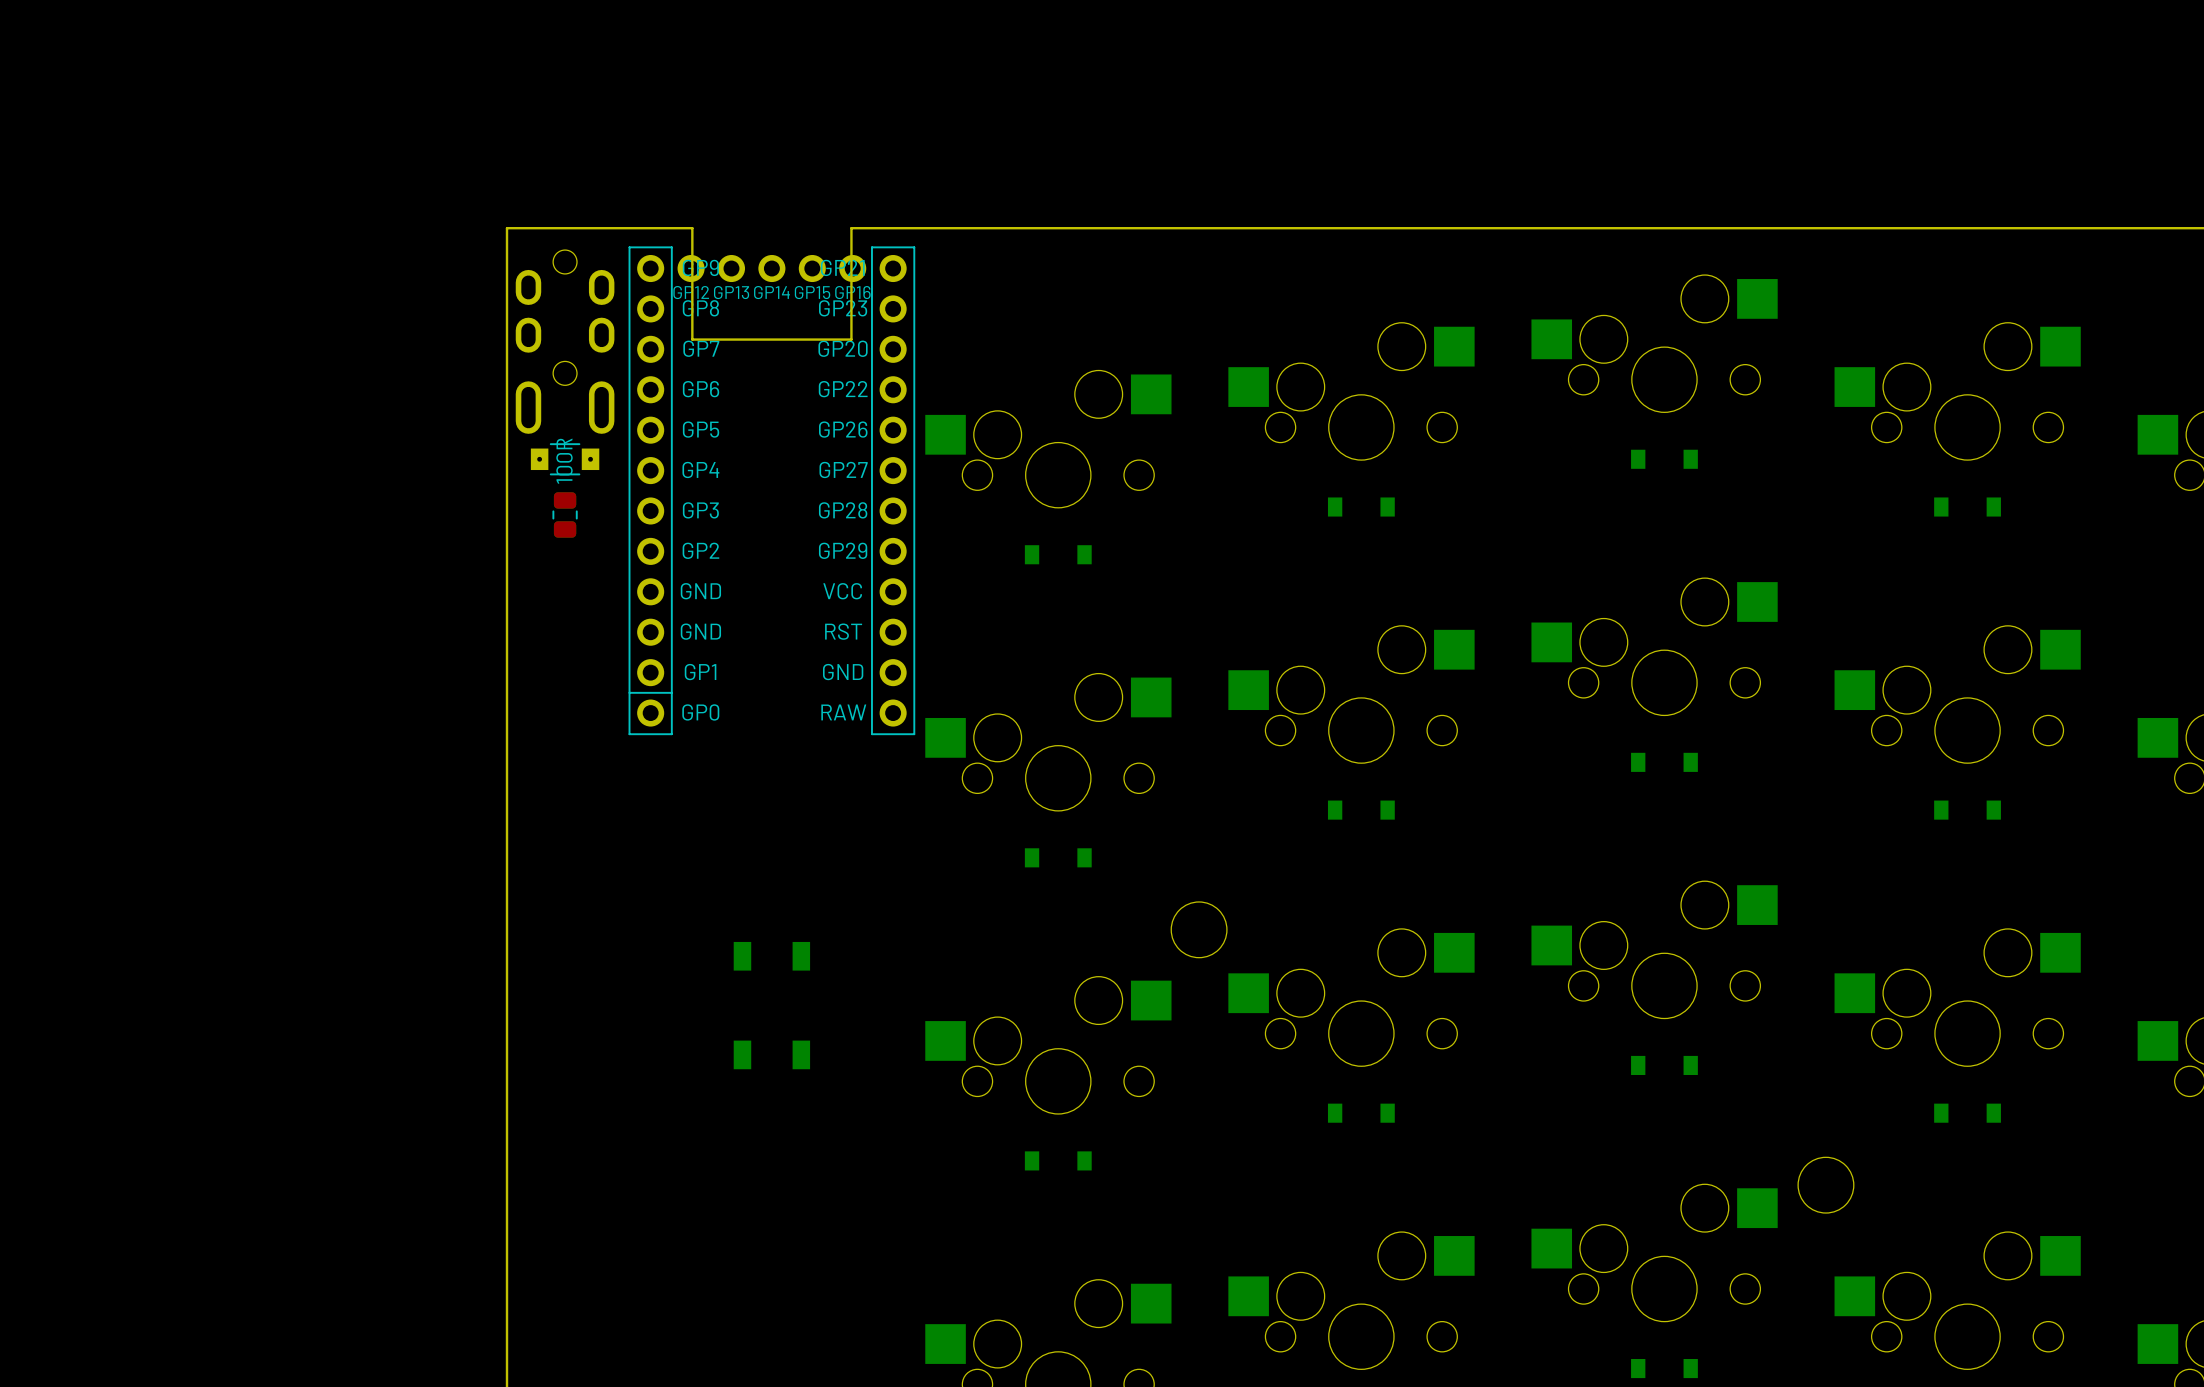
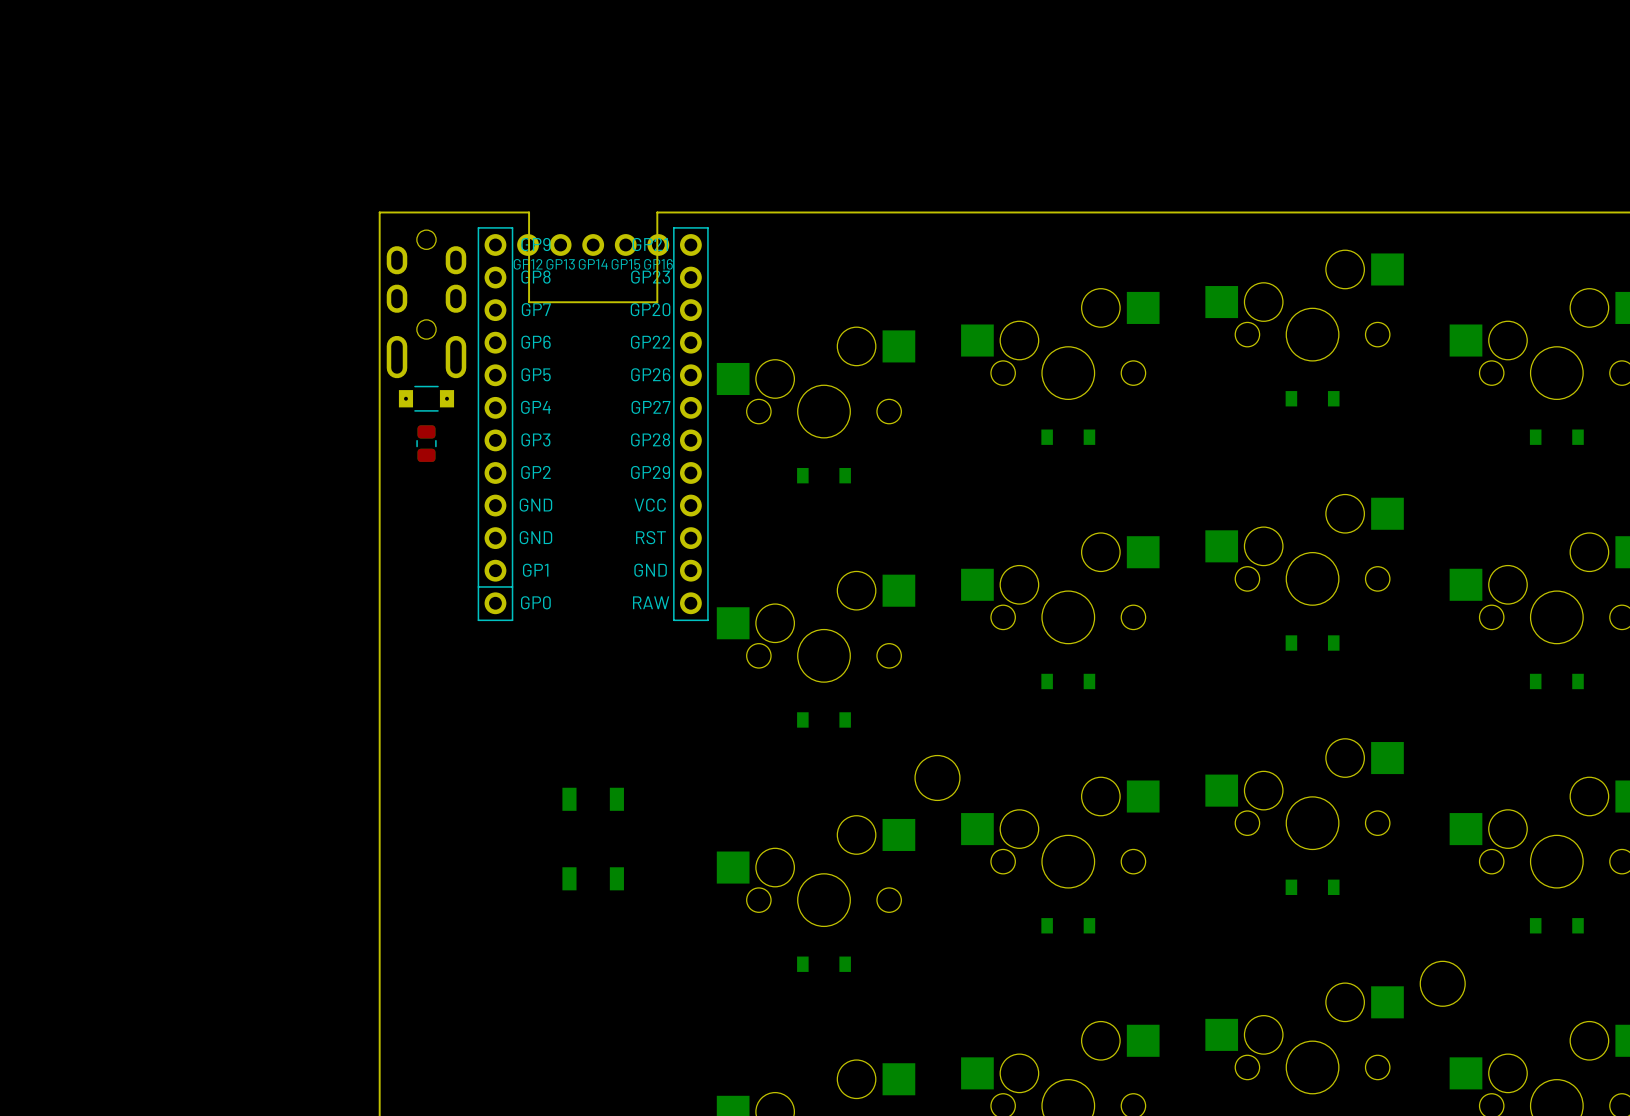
part text: 100R (564, 461) -> none

